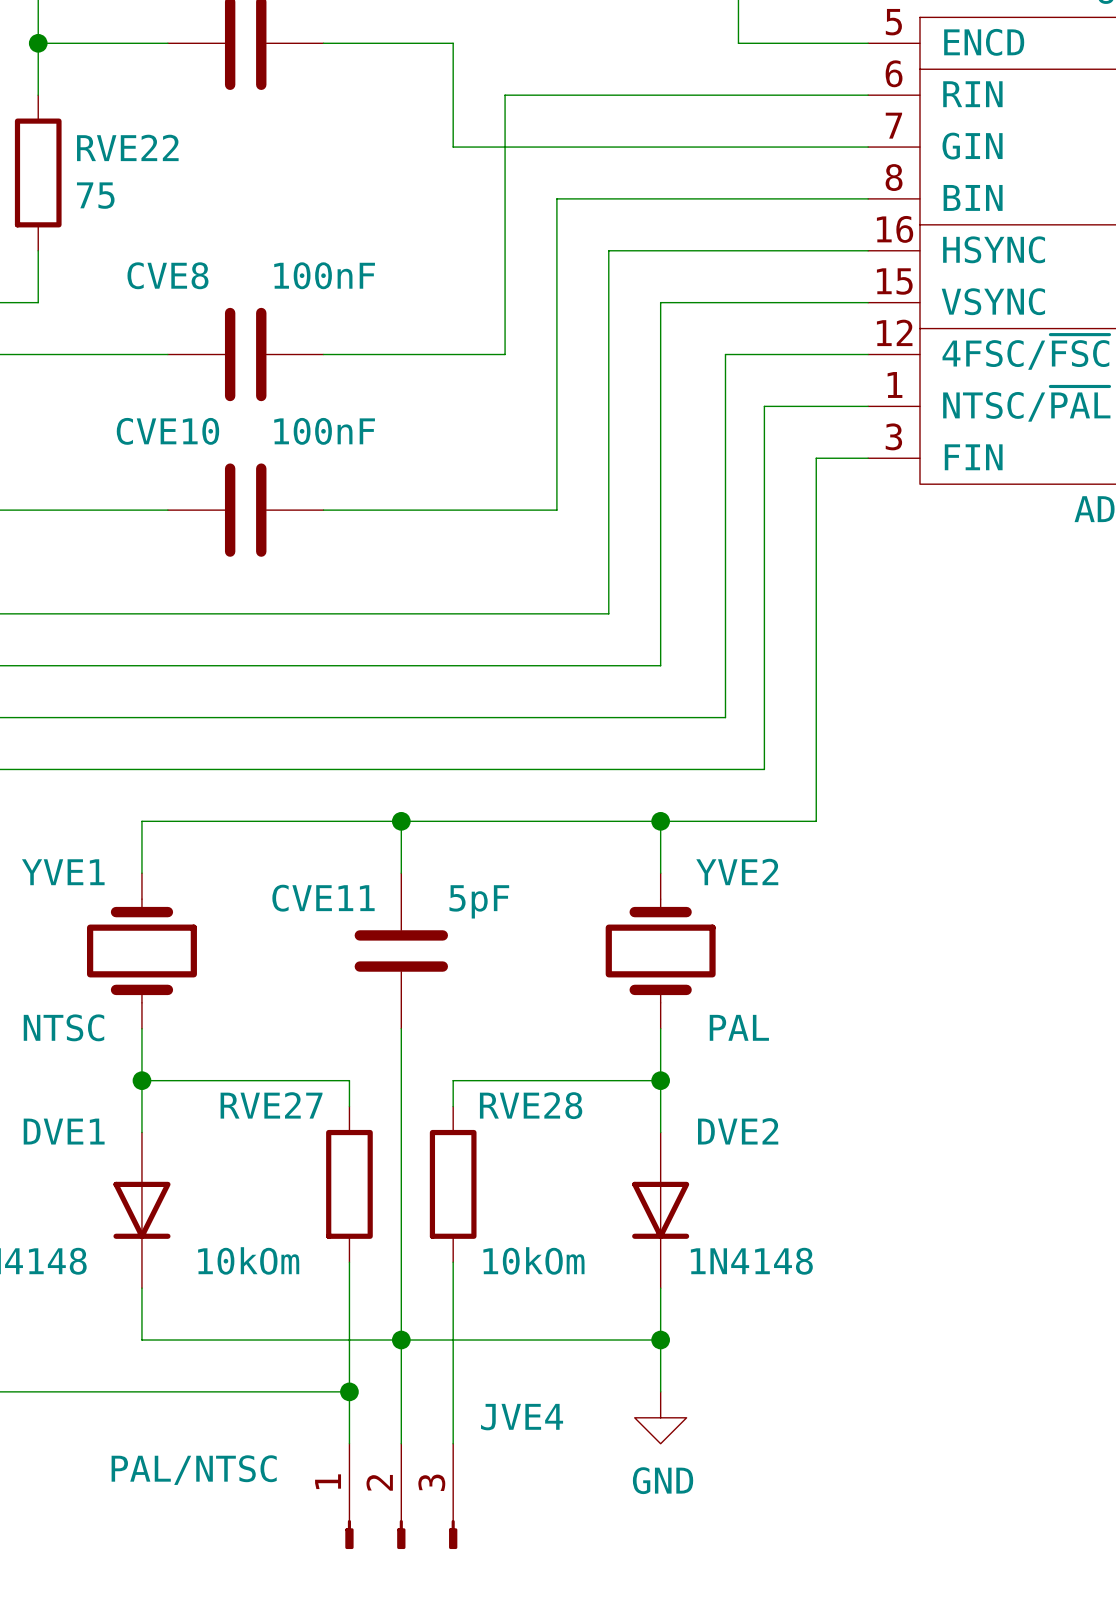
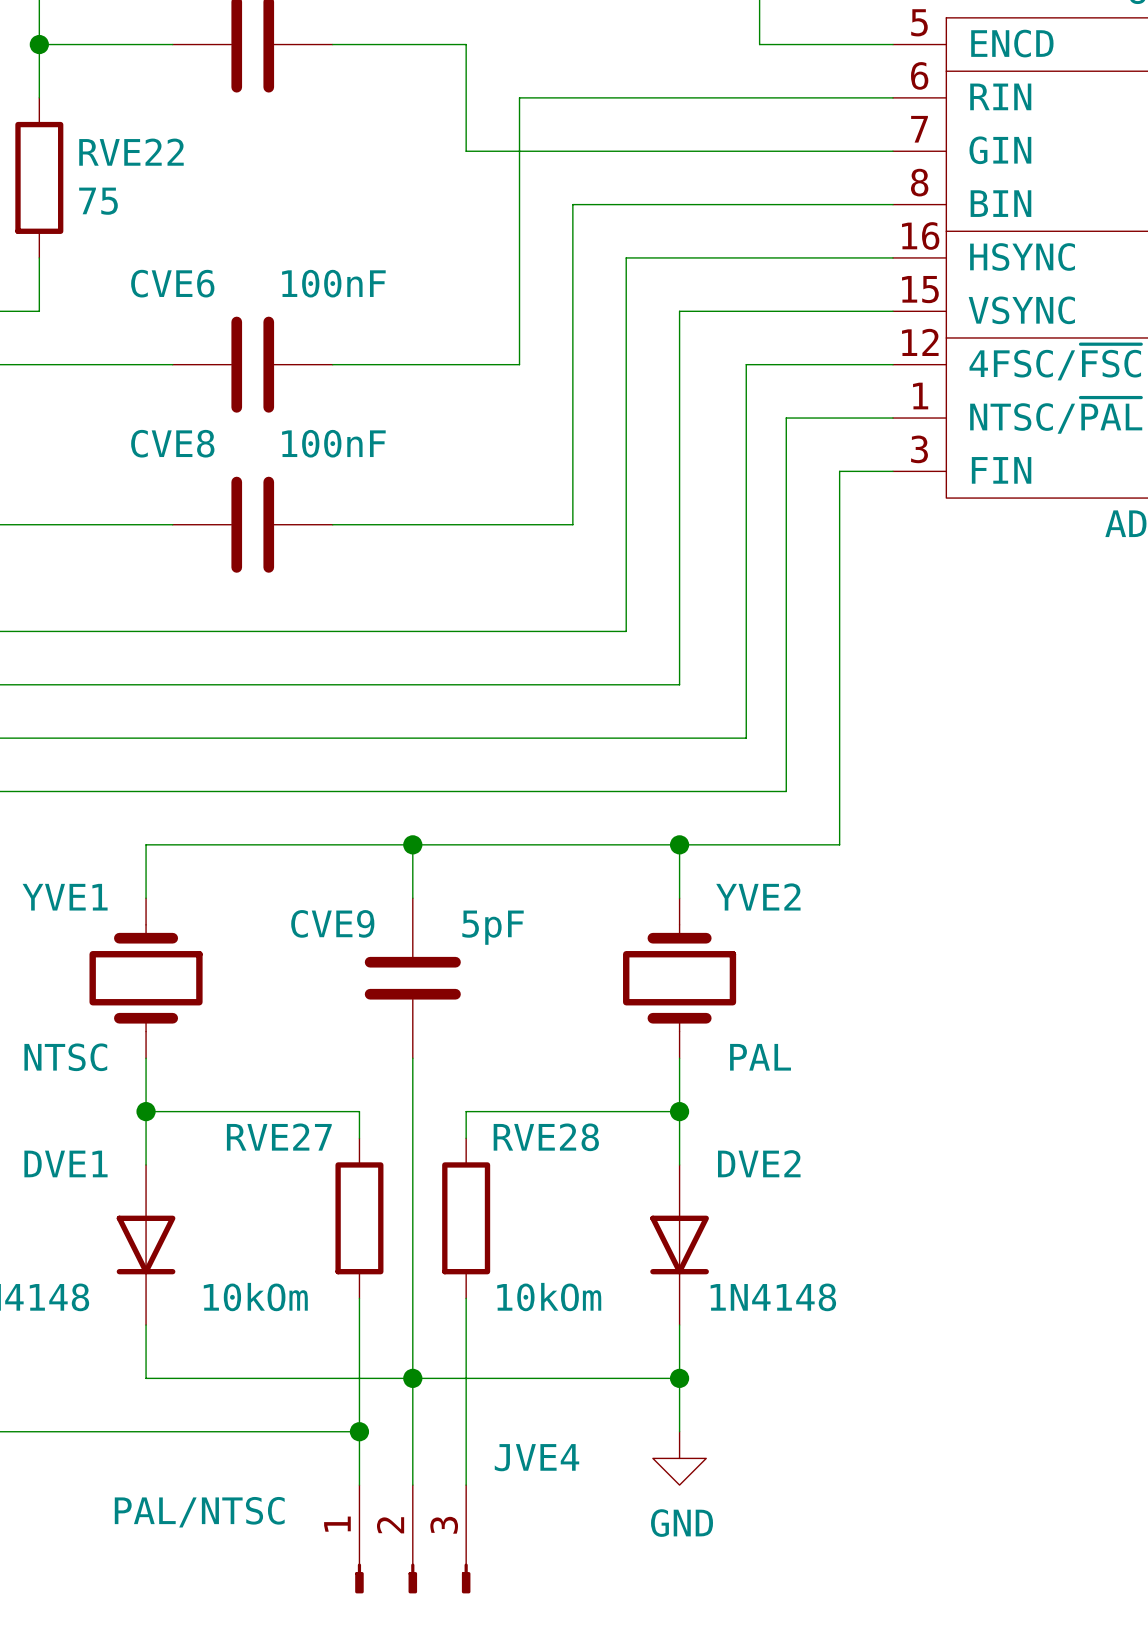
CVE8 name: CVE8 (167, 275) -> CVE6 (172, 283)
CVE10 name: CVE10 (167, 431) -> CVE8 (172, 443)
CVE11 name: CVE11 (323, 898) -> CVE9 (332, 923)

